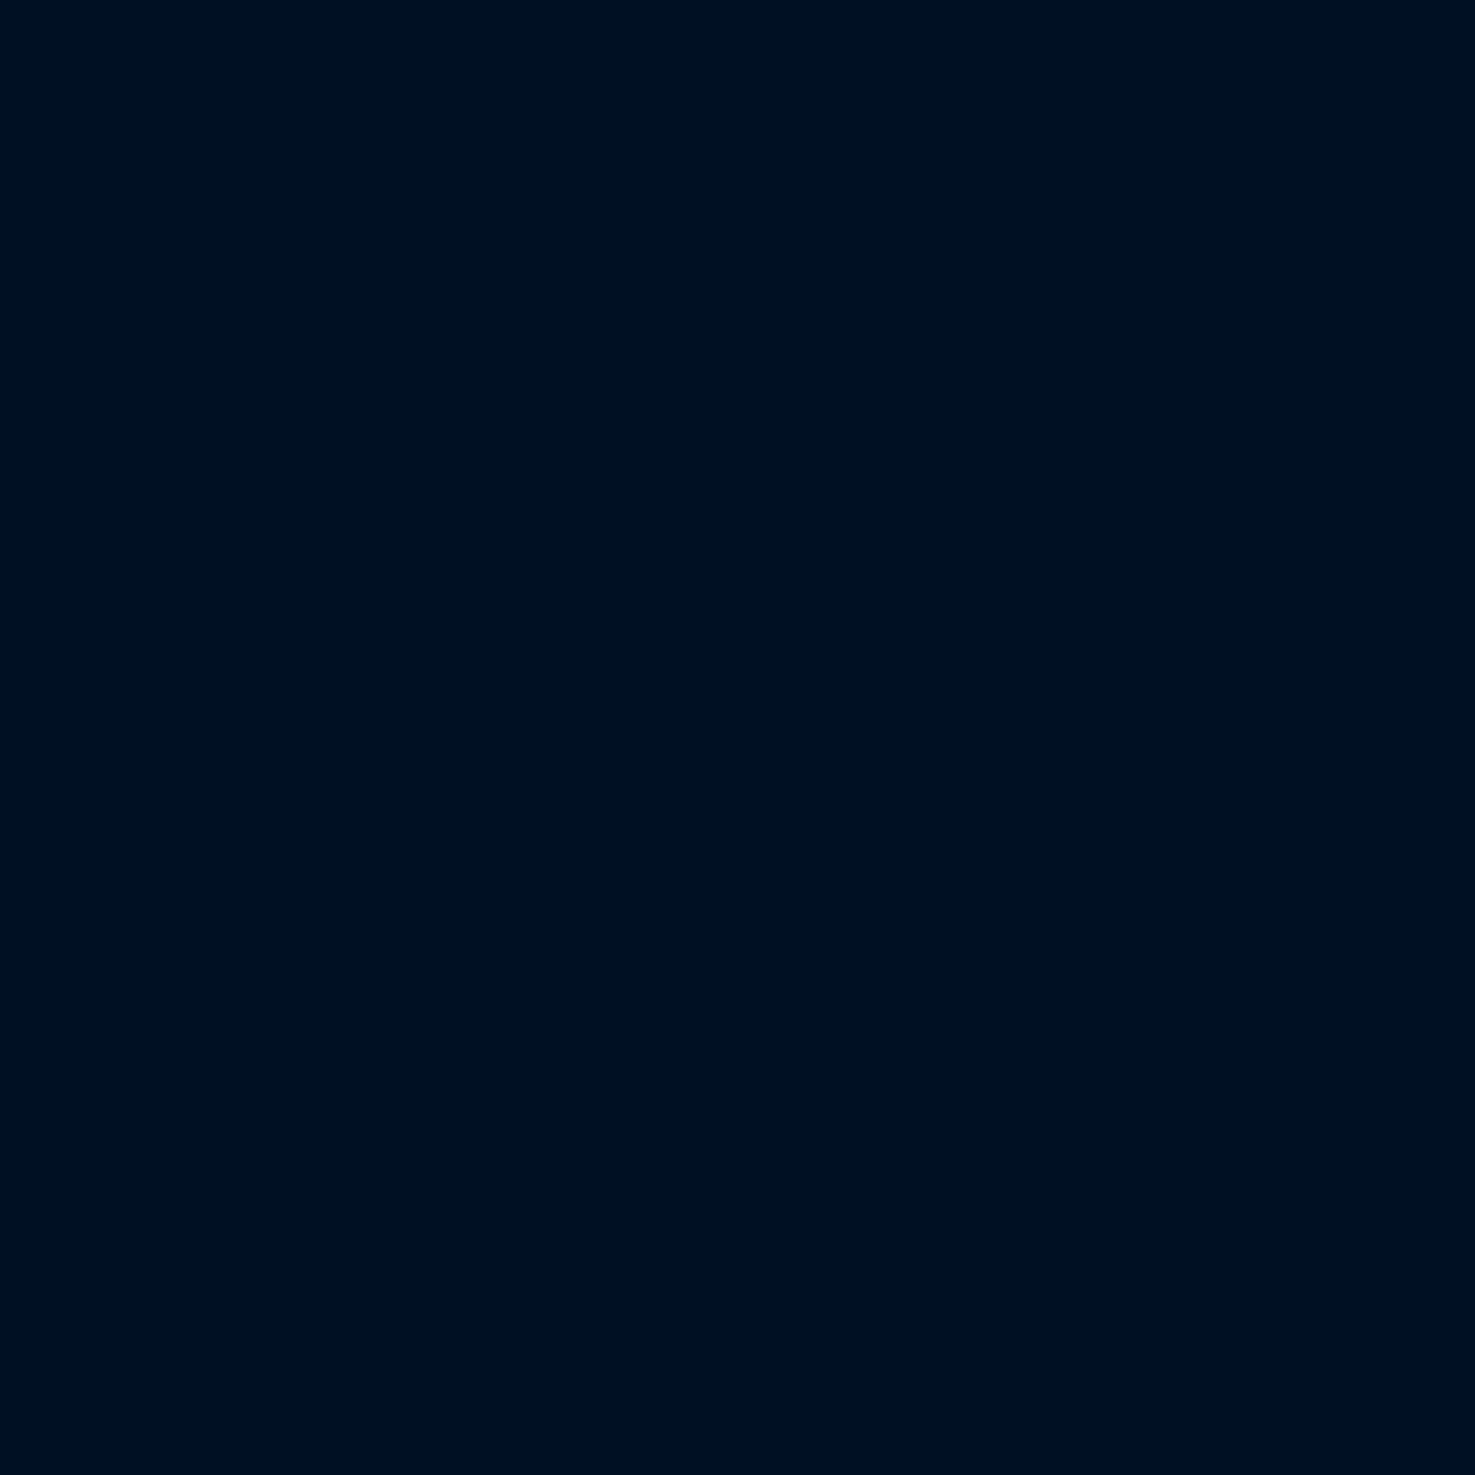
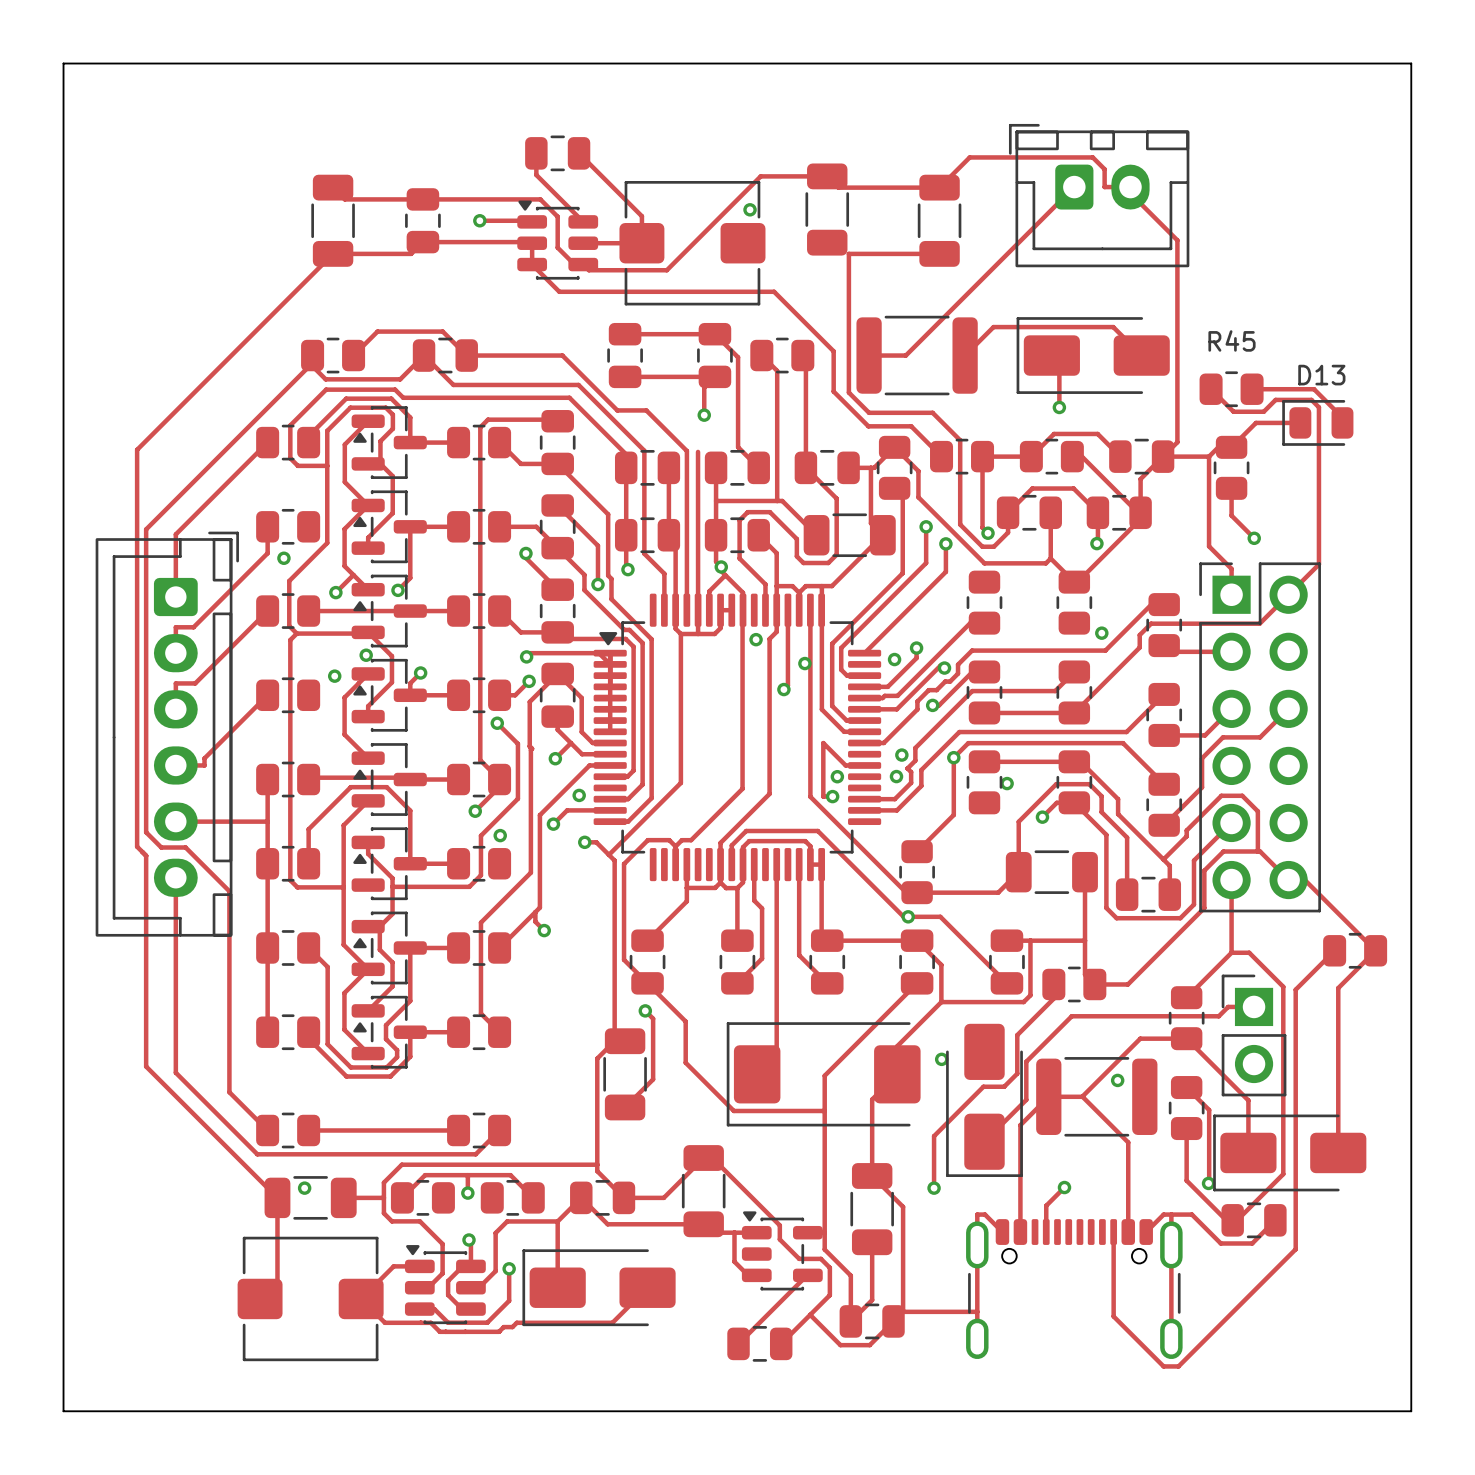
board edge: none -> (63, 63) (1411, 63) (1411, 1411) (63, 1411) (63, 63)
track: none -> (536, 153) (536, 174) (583, 221)
part: none -> (557, 153)
track: none -> (579, 153) (641, 216) (641, 243) (583, 243)
track: none -> (1074, 187) (905, 355) (869, 355)
track: none -> (1124, 187) (1177, 240) (1177, 442) (1140, 479) (1140, 512) (1138, 512)
track: none -> (1130, 187) (1104, 187) (1104, 169) (1092, 157) (969, 157) (939, 187) (838, 187) (827, 176) (760, 176) (666, 270) (588, 270) (583, 264) (574, 264) (557, 247) (557, 216) (540, 199) (344, 199) (333, 187)
part: none -> (1099, 195)
via: none -> (750, 209)
part: none -> (827, 209)
part: none -> (333, 220)
part: none -> (422, 220)
track: none -> (479, 220) (532, 221)
via: none -> (479, 220)
part: none -> (939, 220)
part: none -> (557, 240)
part: none -> (692, 243)
track: none -> (939, 253) (848, 253) (848, 392) (869, 412) (932, 412) (960, 440) (960, 524) (982, 546) (993, 546) (1008, 532) (1008, 512) (1032, 488) (1073, 488) (1097, 512) (1096, 543)
track: none -> (625, 334) (714, 334) (738, 357) (738, 447) (758, 467)
part: none -> (333, 355)
track: none -> (353, 355) (377, 331) (442, 331) (466, 355) (562, 355) (617, 410) (646, 410) (686, 451) (686, 610)
part: none -> (445, 355)
part: none -> (625, 355)
part: none -> (714, 355)
track: none -> (761, 355) (777, 370) (777, 500)
part: none -> (782, 355)
track: none -> (802, 355) (805, 358) (805, 467) (836, 498) (836, 554) (828, 563) (803, 563) (796, 556) (796, 539) (769, 512) (747, 512) (739, 520) (739, 558) (765, 584) (765, 610)
part: none -> (917, 355)
track: none -> (965, 355) (993, 327) (1113, 327) (1141, 355)
track: none -> (1051, 355) (1059, 363) (1059, 407)
part: none -> (1093, 355)
track: none -> (312, 366) (325, 379) (400, 379) (424, 355) (453, 384) (578, 384) (644, 450) (644, 553) (664, 573) (664, 610)
track: none -> (312, 366) (309, 366) (146, 529) (146, 832) (161, 847) (185, 847) (229, 891) (229, 1092) (267, 1130)
track: none -> (625, 376) (714, 376) (704, 387) (704, 415)
track: none -> (1211, 389) (1233, 411) (1263, 411) (1275, 399) (1311, 399) (1318, 407) (1318, 564) (1259, 623) (1151, 623) (1139, 635) (1139, 647) (1074, 712) (984, 712)
R45: none -> (1231, 389)
track: none -> (1252, 389) (1314, 389) (1342, 417) (1342, 422)
via: none -> (1059, 407)
via: none -> (704, 415)
track: none -> (368, 421) (344, 444) (344, 482) (368, 505) (344, 529) (344, 566) (368, 589)
track: none -> (557, 421) (556, 419) (487, 419) (480, 427) (480, 760) (499, 779) (499, 786) (475, 811)
track: none -> (1300, 422) (1256, 422) (1231, 447) (1218, 447) (1209, 456)
D13: none -> (1317, 422)
track: none -> (267, 442) (175, 534) (175, 597)
part: none -> (288, 442)
track: none -> (308, 442) (308, 436) (346, 398) (391, 398) (410, 417) (410, 442) (458, 442)
part: none -> (389, 442)
part: none -> (479, 442)
track: none -> (499, 442) (520, 463) (557, 463) (608, 514) (608, 575) (611, 578) (611, 599) (651, 639) (651, 798) (628, 821) (610, 821)
part: none -> (557, 442)
track: none -> (698, 451) (698, 634)
track: none -> (941, 456) (911, 426) (868, 426) (833, 391) (833, 351) (774, 291) (559, 291) (532, 264) (531, 242) (422, 242) (411, 253) (333, 253) (137, 449) (137, 846) (146, 855) (146, 1066) (277, 1197) (277, 1281) (260, 1298)
part: none -> (962, 456)
part: none -> (1051, 456)
track: none -> (1072, 456) (1081, 456) (1138, 512)
track: none -> (1120, 456) (1097, 433) (1054, 433) (1031, 456) (982, 456) (982, 527) (988, 533)
part: none -> (1141, 456)
track: none -> (1163, 456) (1209, 456)
track: none -> (1209, 456) (1209, 546) (1231, 568) (1231, 594)
track: none -> (380, 463) (392, 476) (392, 513) (368, 537) (368, 548)
track: none -> (380, 463) (380, 441) (392, 428) (392, 414) (385, 407) (350, 407) (327, 430) (327, 543) (289, 580) (289, 626) (296, 633)
track: none -> (327, 465) (297, 465) (290, 458) (290, 425) (326, 389) (395, 389) (403, 397) (569, 397) (626, 454) (626, 567) (627, 569)
part: none -> (647, 467)
track: none -> (668, 467) (668, 535) (675, 541) (675, 628) (680, 634)
track: none -> (716, 467) (716, 561) (721, 566) (721, 571) (743, 592) (742, 788) (691, 840) (681, 840) (675, 846)
part: none -> (737, 467)
part: none -> (827, 467)
track: none -> (848, 467) (874, 467) (894, 447) (918, 471) (918, 497) (984, 563) (1045, 563) (1050, 558)
track: none -> (870, 467) (870, 523) (882, 535) (831, 586) (805, 586) (799, 592)
part: none -> (894, 467)
part: none -> (1231, 467)
track: none -> (894, 488) (902, 496) (902, 573) (832, 643) (832, 706) (846, 720) (864, 720)
track: none -> (1231, 488) (1231, 515) (1254, 538)
track: none -> (716, 500) (782, 500) (816, 535)
track: none -> (557, 505) (597, 545) (597, 584)
part: none -> (1029, 512)
track: none -> (1050, 512) (1050, 558)
part: none -> (1119, 512)
track: none -> (1138, 512) (1138, 521) (1077, 582) (1074, 582) (1050, 558)
track: none -> (267, 526) (267, 553) (193, 627) (175, 627) (175, 653)
part: none -> (288, 526)
part: none -> (389, 526)
track: none -> (458, 526) (410, 526) (410, 578) (397, 590)
part: none -> (479, 526)
track: none -> (499, 526) (536, 526) (584, 574) (584, 590) (624, 629) (629, 629) (642, 643) (642, 784) (628, 799) (610, 799)
part: none -> (557, 526)
track: none -> (926, 526) (926, 563) (841, 648) (841, 669) (847, 675) (864, 675)
via: none -> (926, 526)
via: none -> (988, 533)
part: none -> (647, 535)
part: none -> (737, 535)
track: none -> (758, 535) (776, 553) (776, 631) (769, 638) (769, 793) (720, 842) (720, 882)
part: none -> (849, 535)
via: none -> (1254, 538)
track: none -> (945, 543) (945, 571) (864, 653)
via: none -> (945, 543)
via: none -> (1096, 543)
track: none -> (525, 553) (525, 557) (557, 589)
via: none -> (525, 553)
via: none -> (283, 558)
via: none -> (721, 566)
via: none -> (627, 569)
track: none -> (353, 575) (335, 592)
track: none -> (725, 575) (709, 591) (709, 610)
via: none -> (597, 584)
track: none -> (776, 586) (792, 586) (799, 592)
track: none -> (821, 586) (821, 709) (844, 731) (864, 731)
via: none -> (397, 590)
via: none -> (335, 592)
part: none -> (984, 602)
part: none -> (1074, 602)
track: none -> (1164, 604) (1151, 604) (1105, 650) (972, 650) (958, 664) (958, 673) (950, 681) (945, 681) (936, 690) (928, 690) (917, 701) (917, 709) (883, 743) (864, 743)
track: none -> (731, 610) (720, 610) (720, 628) (714, 634) (680, 634)
track: none -> (787, 610) (787, 685) (783, 689)
track: none -> (810, 610) (810, 796) (906, 892) (998, 892) (1018, 872) (1018, 821) (1056, 784) (1089, 784) (1101, 796) (1101, 812) (1127, 837) (1127, 894)
track: none -> (267, 611) (195, 683) (175, 683) (175, 709)
part: none -> (288, 611)
track: none -> (308, 611) (458, 611)
part: none -> (389, 611)
part: none -> (479, 611)
track: none -> (499, 611) (520, 632) (557, 632) (564, 638) (625, 638) (633, 646) (633, 770) (627, 776) (610, 776)
part: none -> (557, 611)
track: none -> (984, 623) (970, 623) (897, 695) (864, 698)
part: none -> (1164, 625)
track: none -> (296, 633) (290, 640) (290, 880) (297, 887) (343, 887)
track: none -> (296, 633) (368, 632) (391, 656) (391, 682) (368, 706) (368, 716)
via: none -> (1101, 633)
track: none -> (680, 634) (680, 782) (608, 854)
via: none -> (756, 639)
track: none -> (1164, 645) (1170, 651) (1231, 651)
track: none -> (916, 648) (916, 658) (887, 686) (864, 686)
via: none -> (916, 648)
track: none -> (610, 653) (610, 731)
via: none -> (366, 655)
track: none -> (526, 656) (530, 653) (598, 653) (610, 664)
via: none -> (526, 656)
via: none -> (894, 659)
via: none -> (804, 663)
track: none -> (944, 668) (940, 665) (896, 709) (864, 709)
via: none -> (944, 668)
track: none -> (984, 671) (972, 671) (939, 705) (932, 705)
track: none -> (1074, 671) (1055, 691) (972, 691) (915, 748) (915, 760) (907, 768) (911, 772) (911, 782) (894, 799) (864, 799)
track: none -> (368, 673) (344, 697) (344, 734) (368, 758)
track: none -> (420, 673) (410, 683) (410, 695) (458, 695)
via: none -> (420, 673)
via: none -> (334, 676)
track: none -> (529, 681) (515, 695) (499, 695)
via: none -> (529, 681)
via: none -> (783, 689)
part: none -> (984, 692)
part: none -> (1074, 692)
track: none -> (1164, 694) (1126, 732) (959, 732) (921, 770) (921, 785) (896, 810) (864, 810)
track: none -> (267, 695) (204, 758) (204, 765) (175, 765)
part: none -> (288, 695)
part: none -> (389, 695)
part: none -> (479, 695)
part: none -> (557, 695)
via: none -> (932, 705)
track: none -> (1231, 708) (1205, 735) (1164, 735)
track: none -> (1288, 708) (1260, 737) (1222, 737) (1202, 758) (1202, 787) (1164, 825)
part: none -> (1164, 714)
track: none -> (557, 716) (557, 729) (582, 754) (610, 754)
track: none -> (497, 723) (517, 743) (517, 798) (480, 835) (480, 875) (469, 886) (392, 886)
via: none -> (497, 723)
part: none -> (167, 734)
part: none -> (737, 737)
part: none -> (1260, 737)
track: none -> (570, 743) (555, 758)
track: none -> (610, 743) (592, 743) (581, 732) (581, 697) (557, 673) (529, 701) (529, 746) (532, 748) (530, 872) (480, 922) (480, 1013) (499, 1032)
via: none -> (901, 755)
via: none -> (953, 757)
via: none -> (555, 758)
track: none -> (984, 761) (1080, 761) (1118, 799) (1118, 814) (1169, 865) (1169, 894)
track: none -> (610, 765) (589, 765) (539, 815) (539, 907) (499, 947)
track: none -> (864, 765) (845, 765) (823, 743) (823, 796) (832, 796)
via: none -> (837, 776)
via: none -> (896, 776)
track: none -> (267, 779) (267, 1032)
part: none -> (288, 779)
track: none -> (308, 779) (310, 777) (458, 779)
part: none -> (389, 779)
part: none -> (479, 779)
part: none -> (984, 782)
part: none -> (1074, 782)
via: none -> (1007, 783)
track: none -> (1164, 784) (1123, 743) (968, 743) (953, 757) (953, 814) (917, 851)
via: none -> (579, 795)
via: none -> (832, 796)
track: none -> (368, 800) (343, 825) (343, 944) (368, 969) (344, 993) (344, 1029) (368, 1053)
part: none -> (1164, 804)
track: none -> (610, 810) (567, 810) (553, 824)
via: none -> (475, 811)
track: none -> (1042, 817) (1056, 802) (1074, 802) (1106, 834) (1106, 907) (1116, 918) (1180, 918) (1193, 904) (1193, 860) (1231, 822)
via: none -> (1042, 817)
track: none -> (175, 821) (267, 821)
via: none -> (553, 824)
via: none -> (500, 835)
track: none -> (368, 842) (368, 853) (392, 878) (392, 913) (379, 926)
track: none -> (584, 842) (596, 842) (614, 860) (614, 1041)
via: none -> (584, 842)
track: none -> (675, 846) (669, 840) (647, 840) (624, 864) (624, 959) (685, 1021) (685, 1062) (733, 1110) (824, 1110)
track: none -> (1257, 851) (1257, 811) (1242, 795) (1221, 795) (1186, 830) (1186, 836) (1163, 859)
part: none -> (288, 863)
track: none -> (308, 863) (308, 829) (350, 787) (386, 787) (410, 810) (410, 863) (458, 863)
part: none -> (389, 863)
part: none -> (479, 863)
track: none -> (686, 864) (686, 901) (647, 940)
track: none -> (731, 864) (731, 845) (746, 831) (817, 831) (903, 916) (940, 916) (1006, 983)
track: none -> (754, 864) (754, 900) (762, 908) (762, 958) (737, 983)
track: none -> (776, 864) (776, 1054) (757, 1074)
track: none -> (799, 864) (799, 955) (827, 983)
part: none -> (917, 872)
part: none -> (1051, 872)
track: none -> (1085, 872) (1085, 974) (1094, 984) (1127, 984) (1204, 908) (1204, 870) (1223, 851) (1260, 851) (1288, 880) (1304, 880) (1375, 950) (1338, 988) (1338, 1152)
track: none -> (175, 877) (175, 1072) (257, 1154) (475, 1154) (499, 1130)
track: none -> (1231, 880) (1231, 952)
track: none -> (720, 882) (726, 888) (737, 888)
track: none -> (720, 882) (715, 887) (686, 887)
track: none -> (737, 888) (737, 940)
track: none -> (737, 888) (743, 882) (743, 847) (749, 841) (805, 841) (810, 846) (810, 864) (821, 864) (821, 935) (827, 940) (917, 940) (941, 964) (941, 1002)
part: none -> (1148, 894)
track: none -> (535, 912) (535, 921) (544, 930)
via: none -> (908, 916)
track: none -> (379, 926) (379, 949) (392, 962) (392, 986) (368, 1010)
via: none -> (544, 930)
track: none -> (1006, 940) (1085, 940)
track: none -> (1030, 940) (1030, 995) (1023, 1002) (941, 1002)
part: none -> (288, 947)
track: none -> (308, 947) (327, 967) (327, 1044) (350, 1067) (386, 1067) (397, 1057) (397, 1050) (386, 1039) (386, 1025) (410, 1000) (410, 947) (458, 947)
part: none -> (389, 947)
part: none -> (479, 947)
track: none -> (1334, 950) (1295, 989) (1295, 1249) (1178, 1366) (1163, 1366) (1113, 1316) (1113, 1232)
part: none -> (1355, 950)
track: none -> (1231, 952) (1186, 997)
track: none -> (1231, 952) (1249, 952) (1283, 986) (1283, 1174) (1237, 1220) (1226, 1220) (1186, 1180) (1186, 1128)
part: none -> (647, 962)
part: none -> (737, 962)
part: none -> (827, 962)
part: none -> (917, 962)
part: none -> (1006, 962)
track: none -> (917, 983) (824, 1075) (824, 1249) (850, 1275) (850, 1321) (872, 1300) (872, 1242)
track: none -> (1053, 984) (1053, 998) (1017, 1035) (1017, 1073) (1004, 1086) (983, 1086) (934, 1136) (934, 1188)
part: none -> (1074, 984)
track: none -> (941, 1002) (897, 1046) (897, 1074) (872, 1099) (872, 1175) (903, 1206) (903, 1311)
track: none -> (1254, 1006) (1228, 1006) (1218, 1016) (1071, 1016) (1026, 1061) (1026, 1099) (984, 1141)
track: none -> (645, 1010) (653, 1018) (653, 1079) (625, 1107)
via: none -> (645, 1010)
part: none -> (1186, 1018)
part: none -> (288, 1032)
track: none -> (308, 1032) (308, 1038) (346, 1076) (390, 1076) (410, 1056) (410, 1032) (458, 1032)
part: none -> (389, 1032)
part: none -> (479, 1032)
part: none -> (1254, 1035)
track: none -> (614, 1041) (597, 1058) (597, 1171) (623, 1197) (663, 1197) (703, 1158) (712, 1158) (779, 1225) (779, 1239) (799, 1258) (820, 1258) (829, 1267) (829, 1295) (781, 1343)
via: none -> (941, 1059)
part: none -> (625, 1074)
part: none -> (823, 1074)
via: none -> (1117, 1080)
track: none -> (1186, 1087) (1209, 1110) (1208, 1183)
track: none -> (1082, 1096) (1140, 1038) (1186, 1038) (1248, 1100) (1248, 1152)
part: none -> (1096, 1096)
part: none -> (984, 1100)
part: none -> (1186, 1108)
part: none -> (288, 1130)
track: none -> (308, 1130) (458, 1130)
part: none -> (479, 1130)
part: none -> (1289, 1152)
track: none -> (597, 1164) (401, 1164) (383, 1182) (383, 1213) (391, 1221) (419, 1221) (442, 1244) (442, 1273) (428, 1287) (419, 1287)
track: none -> (467, 1175) (467, 1193)
via: none -> (1208, 1183)
track: none -> (1064, 1187) (1046, 1205) (1046, 1232)
via: none -> (1064, 1187)
via: none -> (304, 1188)
via: none -> (934, 1188)
part: none -> (703, 1191)
via: none -> (467, 1193)
part: none -> (310, 1197)
track: none -> (343, 1197) (383, 1197)
track: none -> (402, 1197) (425, 1175) (510, 1175) (533, 1197)
part: none -> (422, 1197)
part: none -> (512, 1197)
part: none -> (602, 1197)
part: none -> (872, 1209)
track: none -> (1171, 1214) (1171, 1338)
part: none -> (1254, 1220)
track: none -> (1275, 1220) (1252, 1243) (1220, 1243) (1191, 1214) (1163, 1214) (1146, 1232)
track: none -> (557, 1221) (557, 1287)
track: none -> (557, 1221) (581, 1197) (607, 1224) (703, 1224) (712, 1232) (756, 1232)
track: none -> (557, 1221) (507, 1221) (495, 1233) (495, 1271) (479, 1287) (470, 1287)
track: none -> (734, 1232) (734, 1261) (748, 1275) (756, 1275)
track: none -> (1002, 1232) (985, 1214) (977, 1214) (977, 1338)
track: none -> (1020, 1232) (1020, 1125) (1048, 1096) (1082, 1096) (1128, 1142) (1128, 1232)
track: none -> (469, 1239) (470, 1241) (470, 1266) (462, 1266) (448, 1281) (448, 1295) (462, 1309) (470, 1309)
via: none -> (469, 1239)
part: none -> (782, 1250)
track: none -> (419, 1266) (393, 1266) (361, 1298) (384, 1322) (430, 1322) (439, 1331) (498, 1331) (503, 1327) (512, 1327) (516, 1322) (612, 1322) (647, 1287)
track: none -> (509, 1268) (509, 1300) (487, 1322) (448, 1322) (434, 1309) (419, 1309)
via: none -> (509, 1268)
track: none -> (807, 1275) (738, 1343)
part: none -> (445, 1284)
part: none -> (599, 1287)
part: none -> (1074, 1289)
part: none -> (310, 1298)
track: none -> (903, 1311) (869, 1345) (840, 1345) (810, 1314)
track: none -> (903, 1311) (977, 1311)
part: none -> (872, 1321)
part: none -> (759, 1343)

